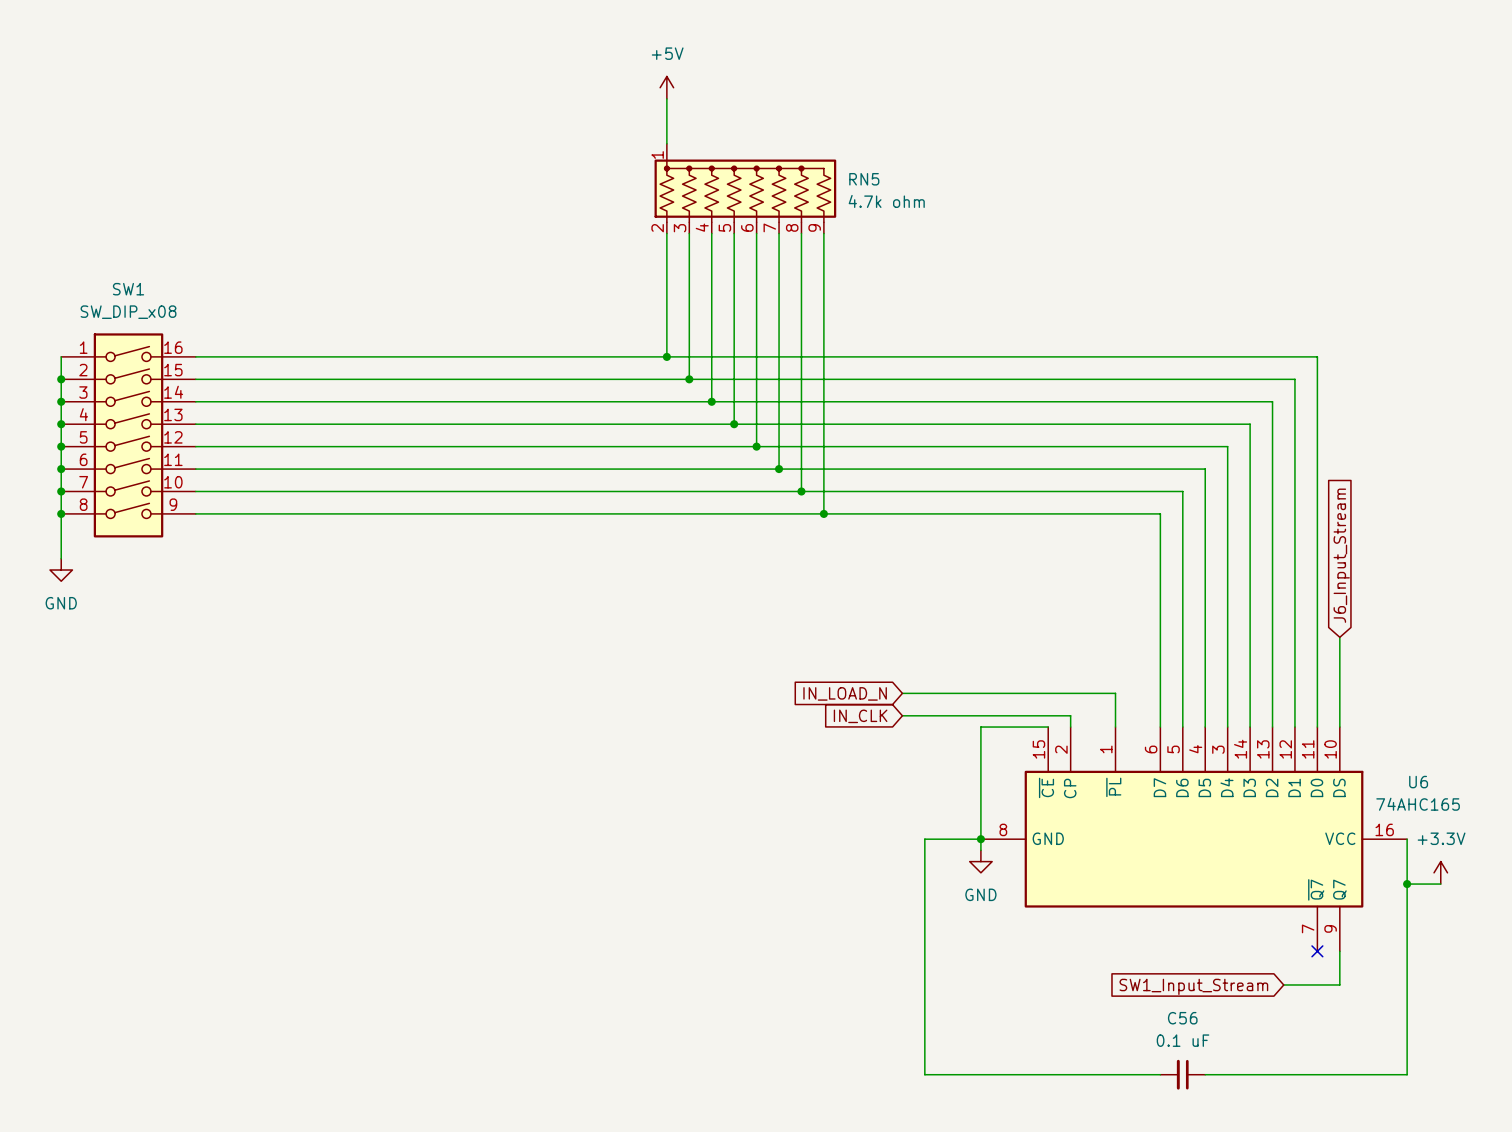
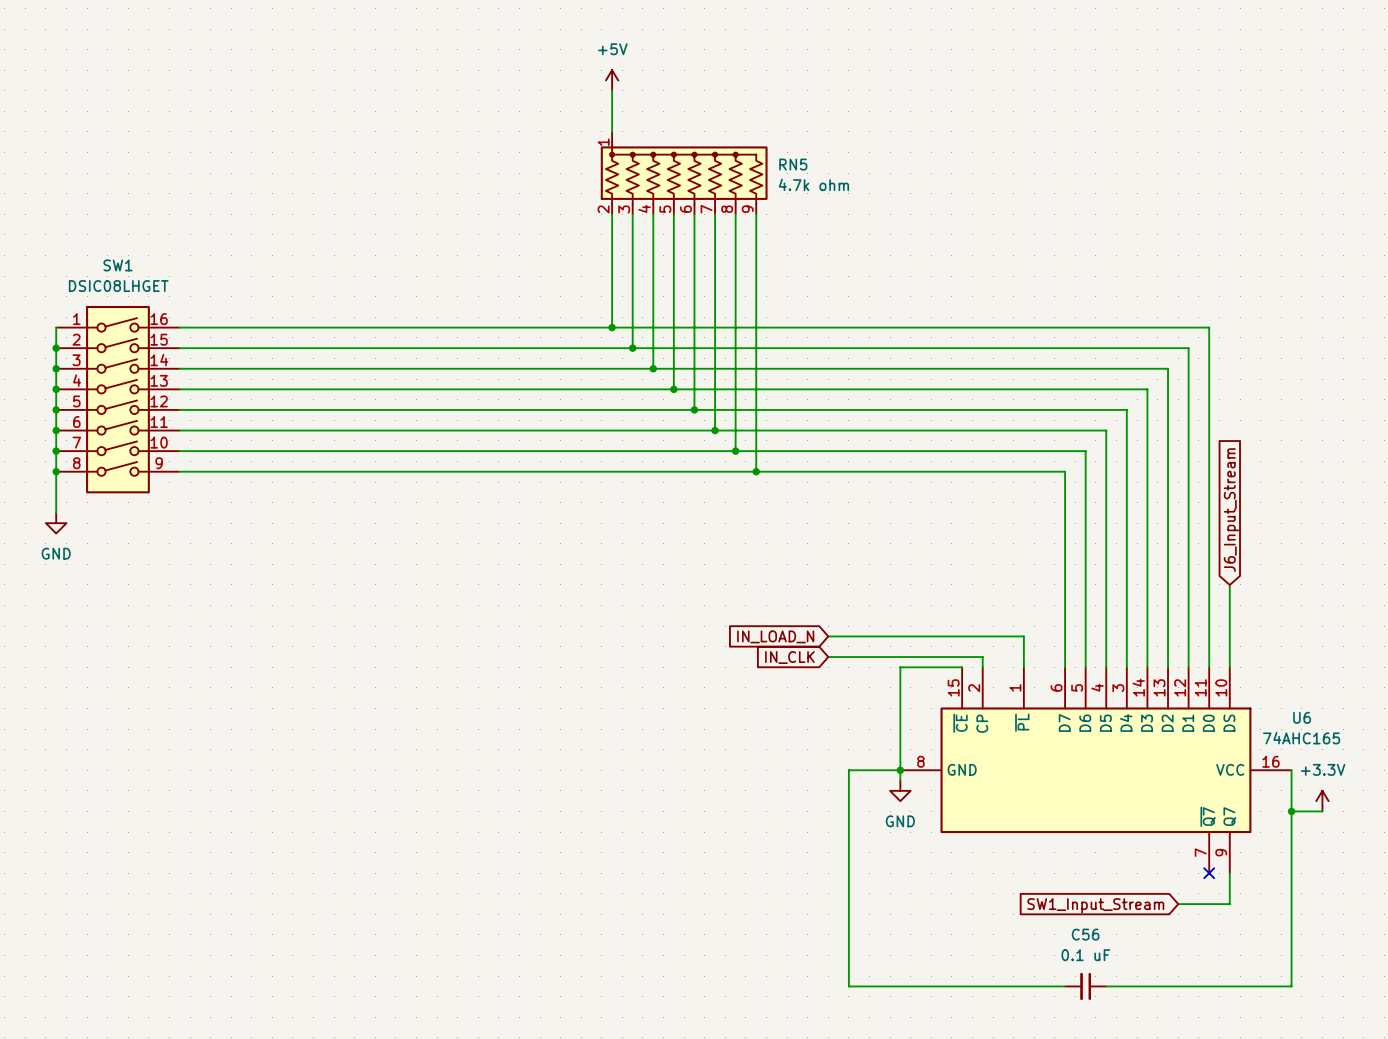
SW1 value: SW_DIP_x08 (128, 312) -> DSIC08LHGET (118, 286)

